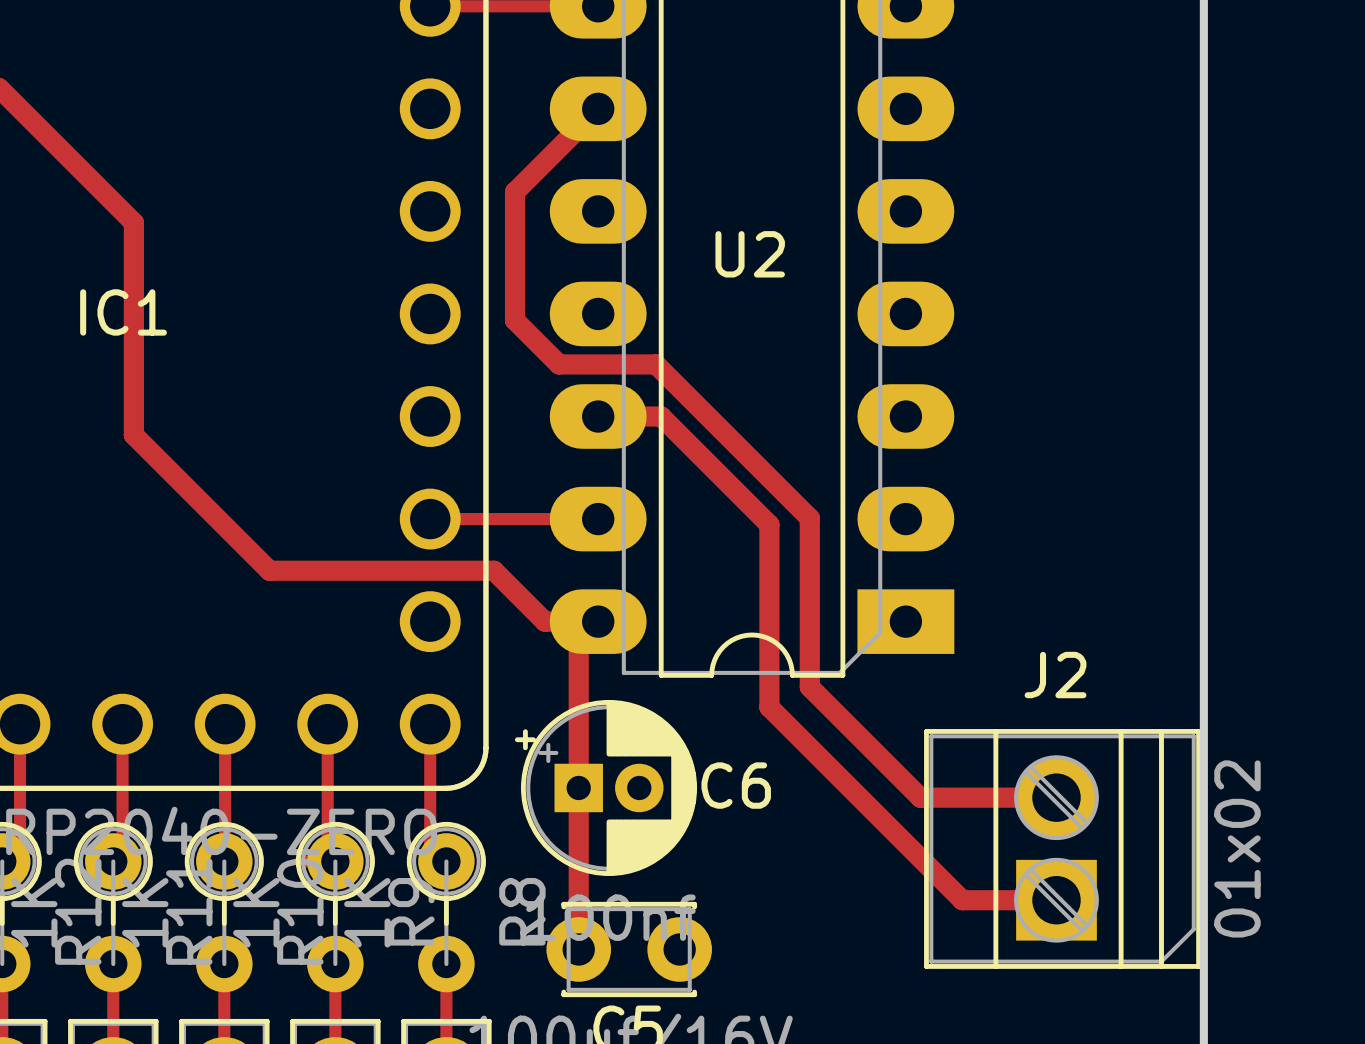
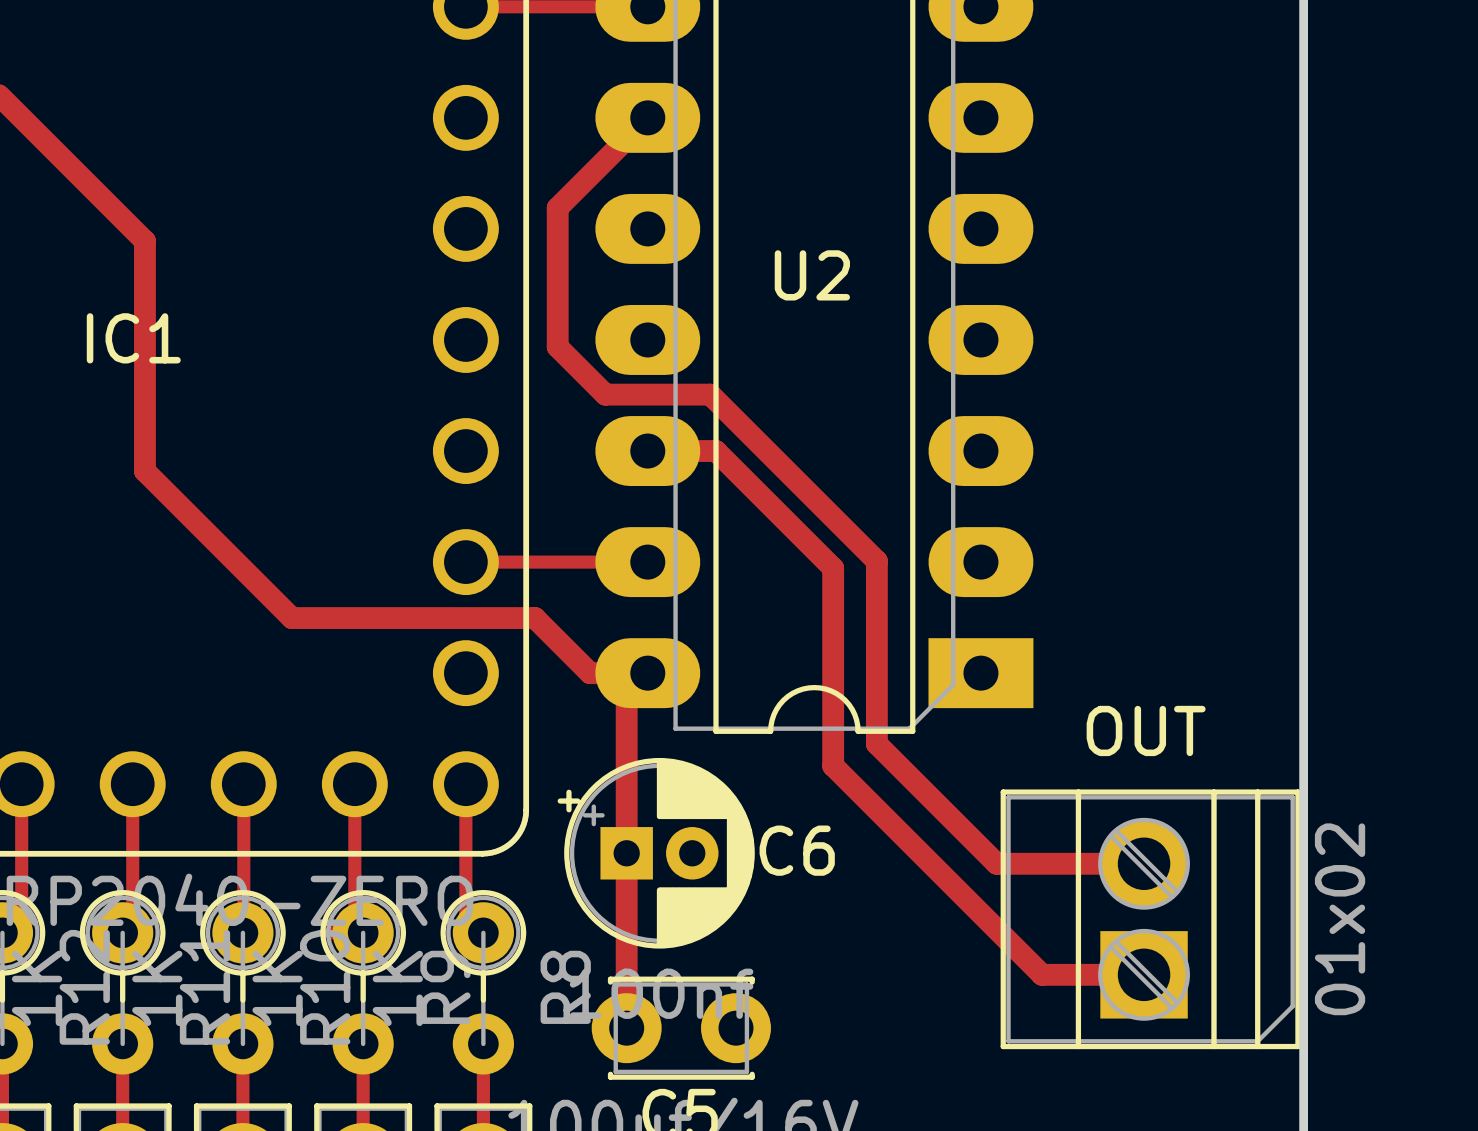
J2 name: J2 (1055, 675) -> OUT (1146, 730)

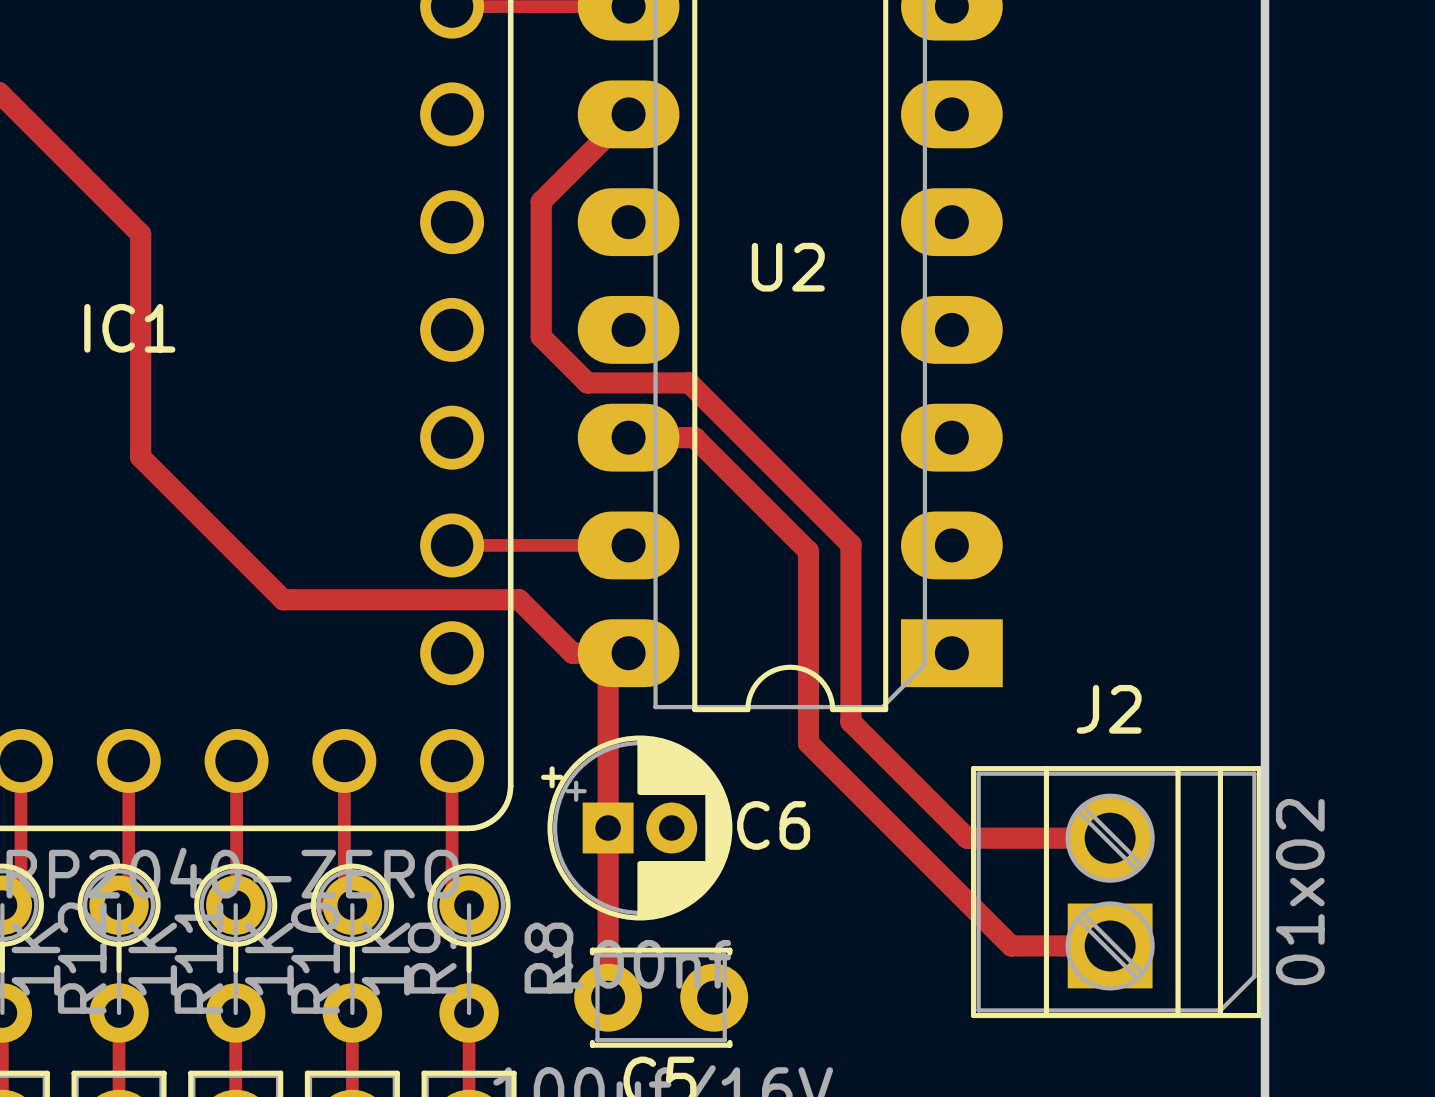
OUT name: OUT (1146, 730) -> J2 (1109, 709)

